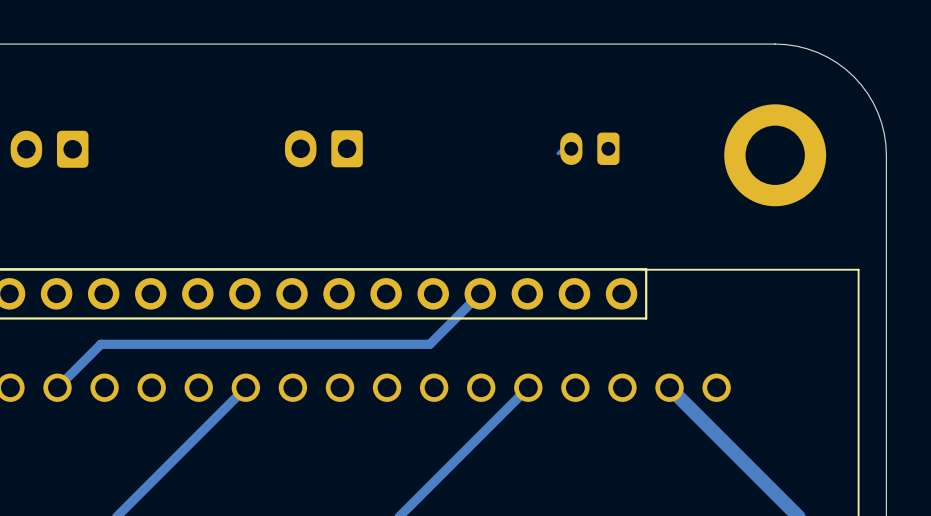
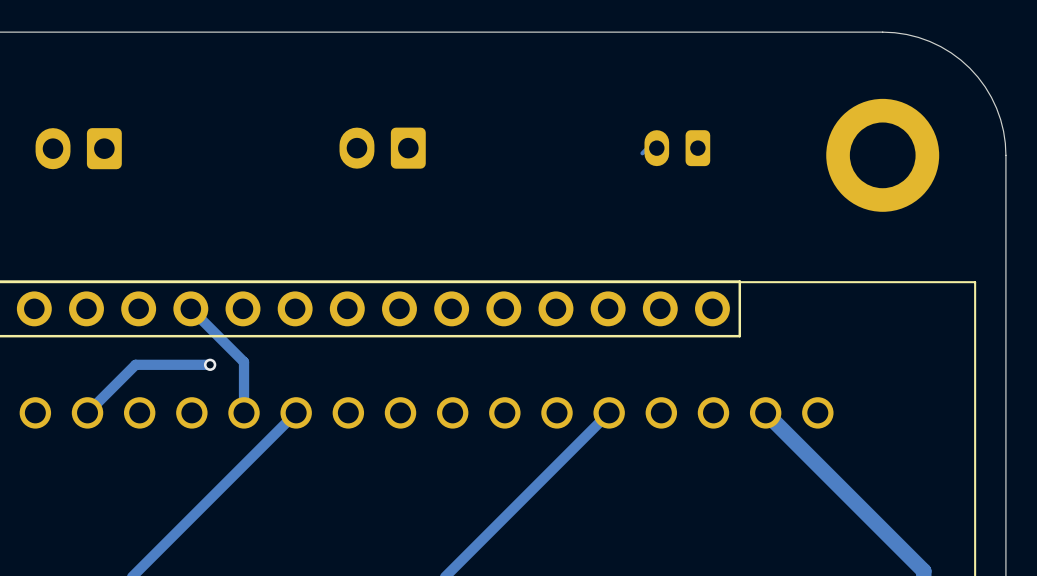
track: none -> (190, 308) (244, 362) (244, 412)
track: (480, 293) (429, 344) (168, 344) -> none
via: none -> (210, 364)

